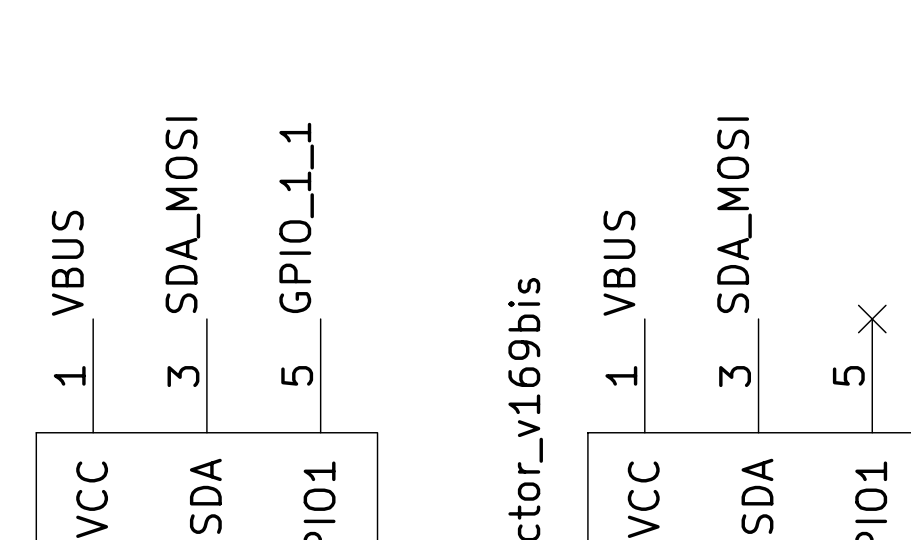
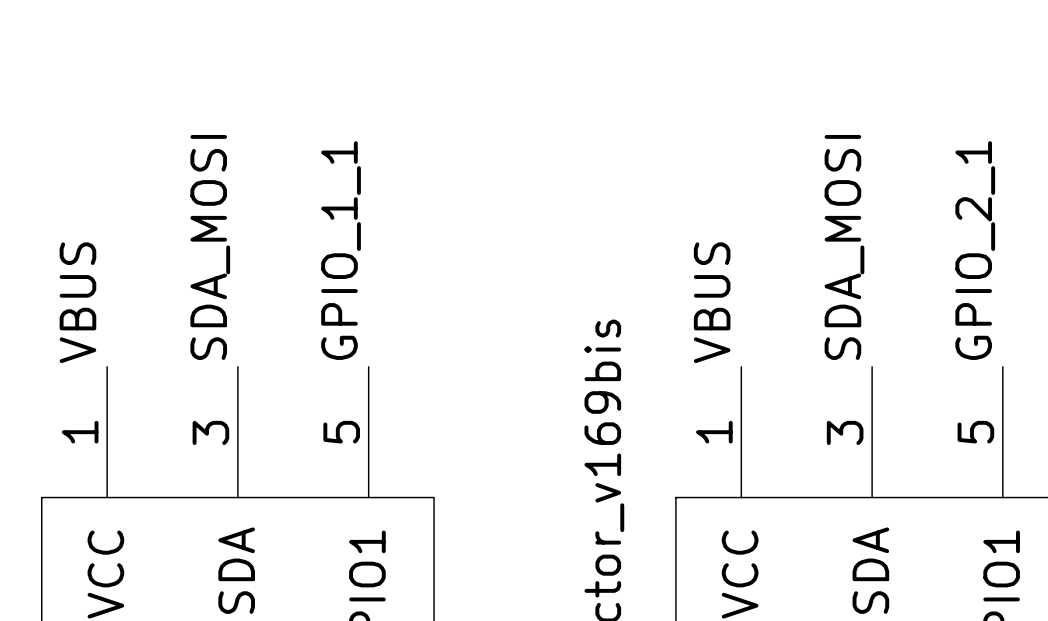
label: none -> GPIO_2_1 (975, 250)
no-connect mark: (872, 319) -> none

